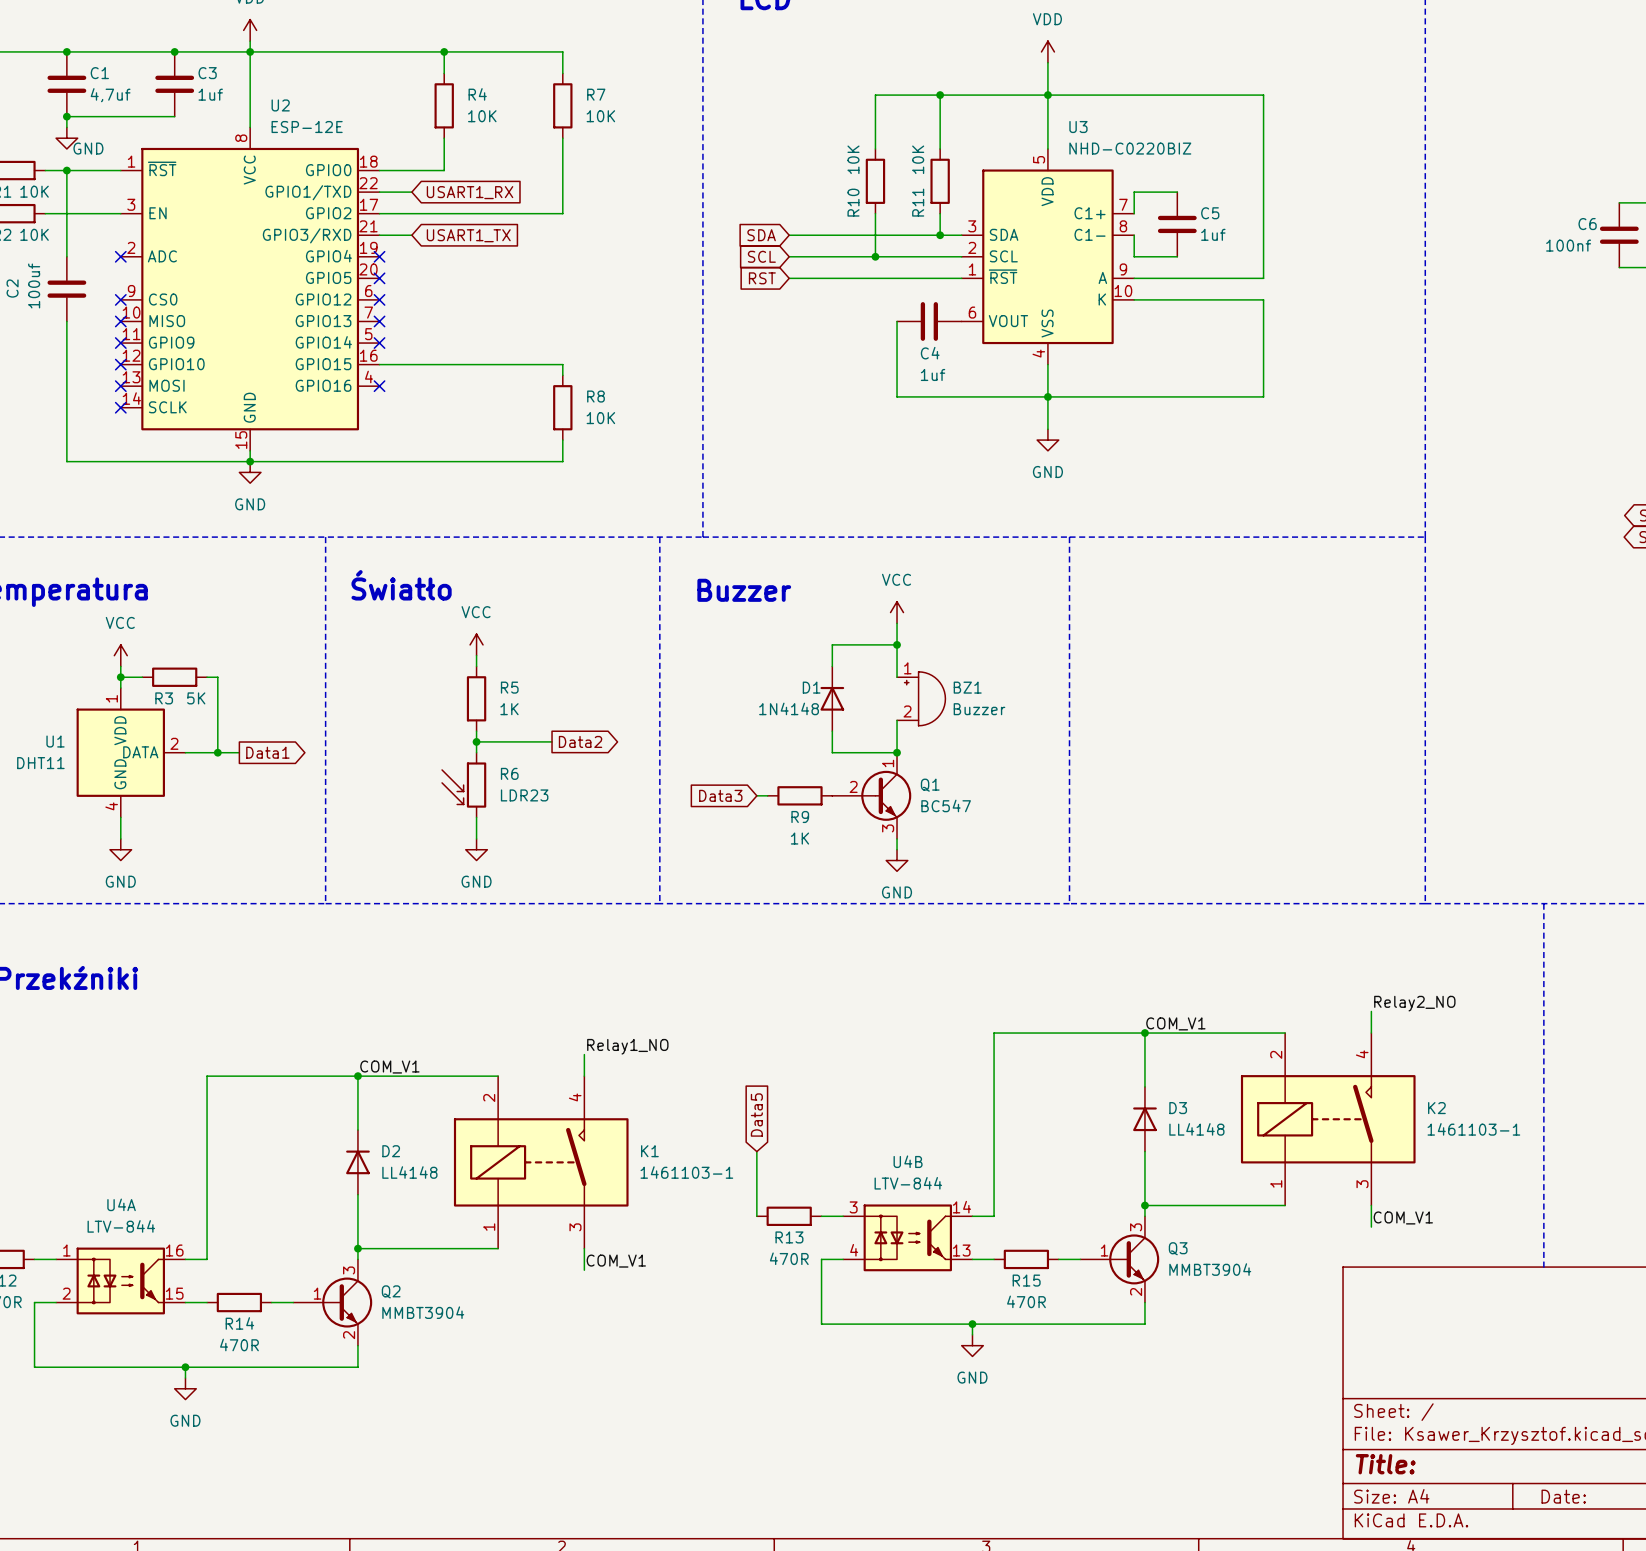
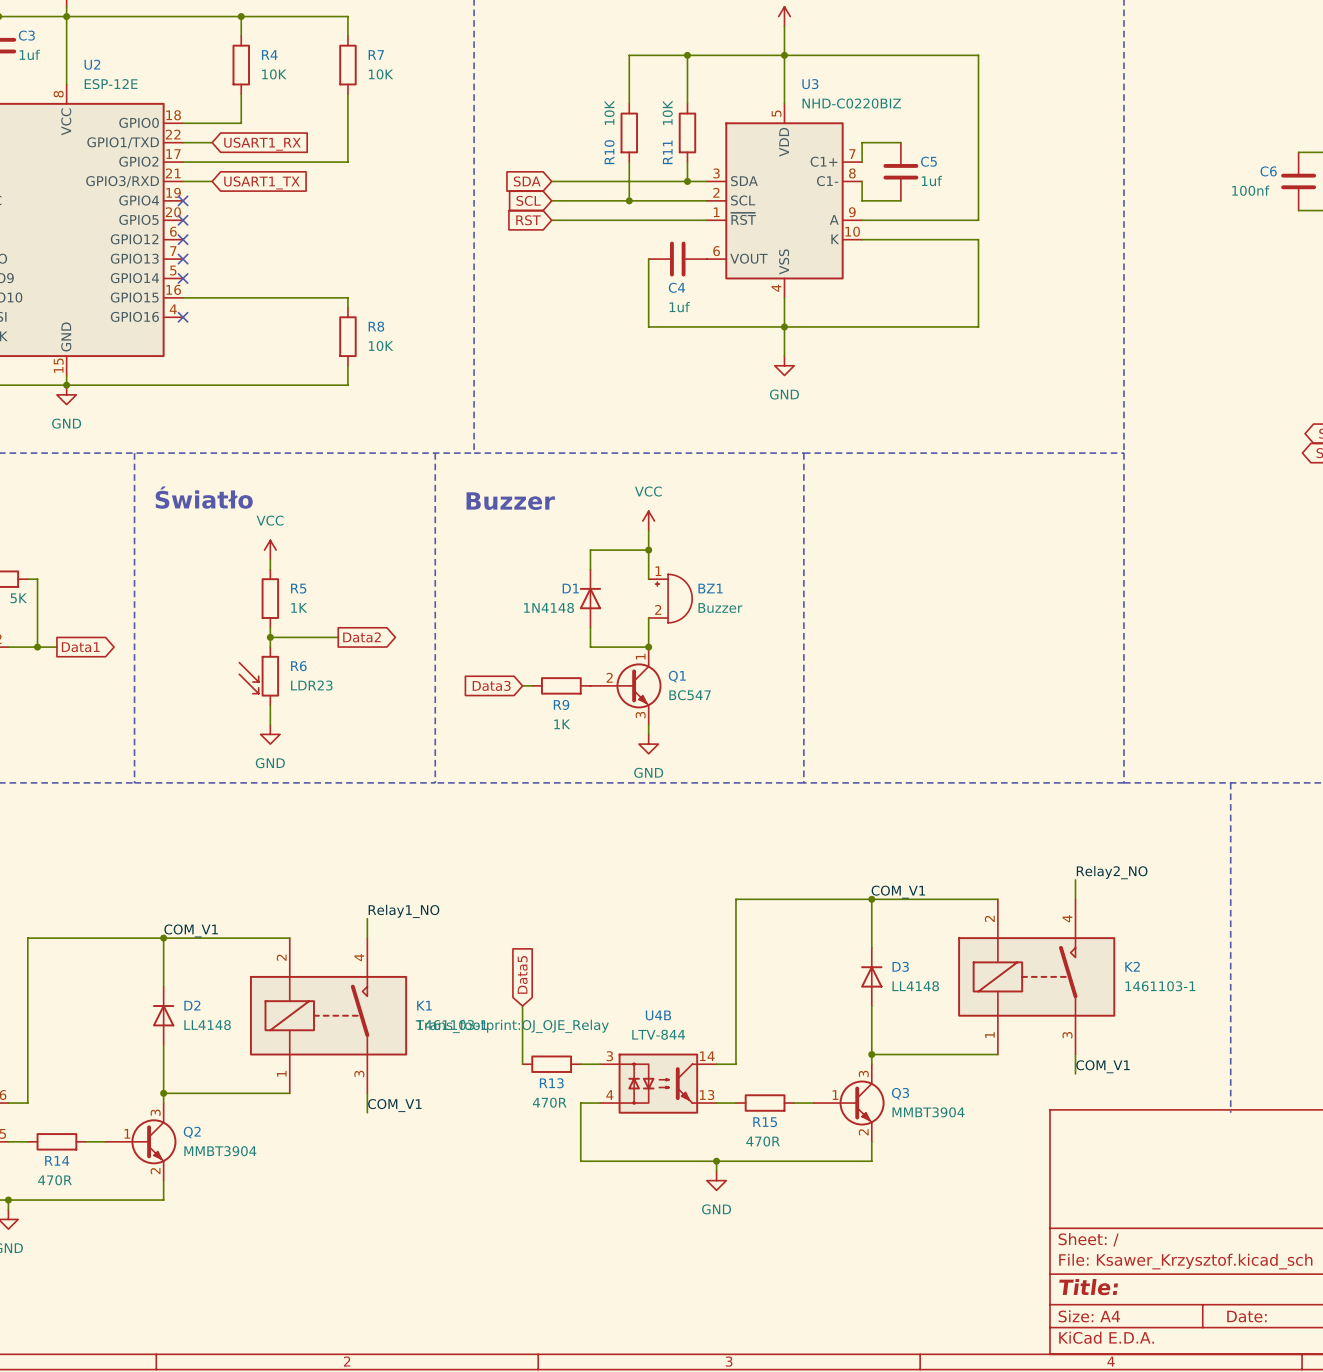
K1 text: none -> Trans_footprint:OJ_OJE_Relay (512, 1026)

